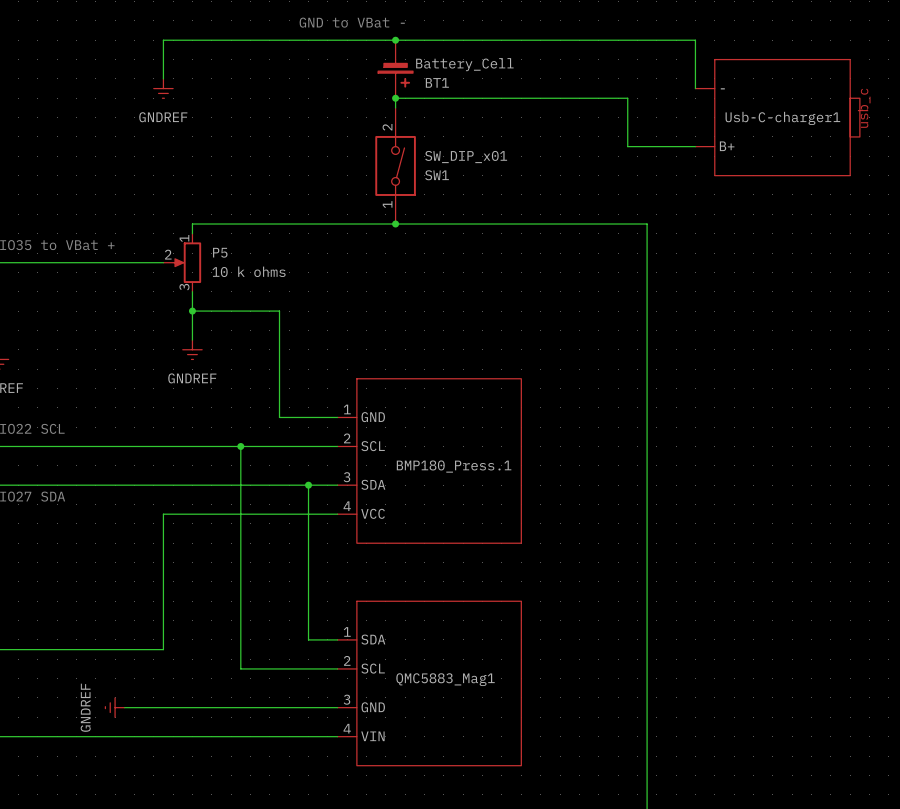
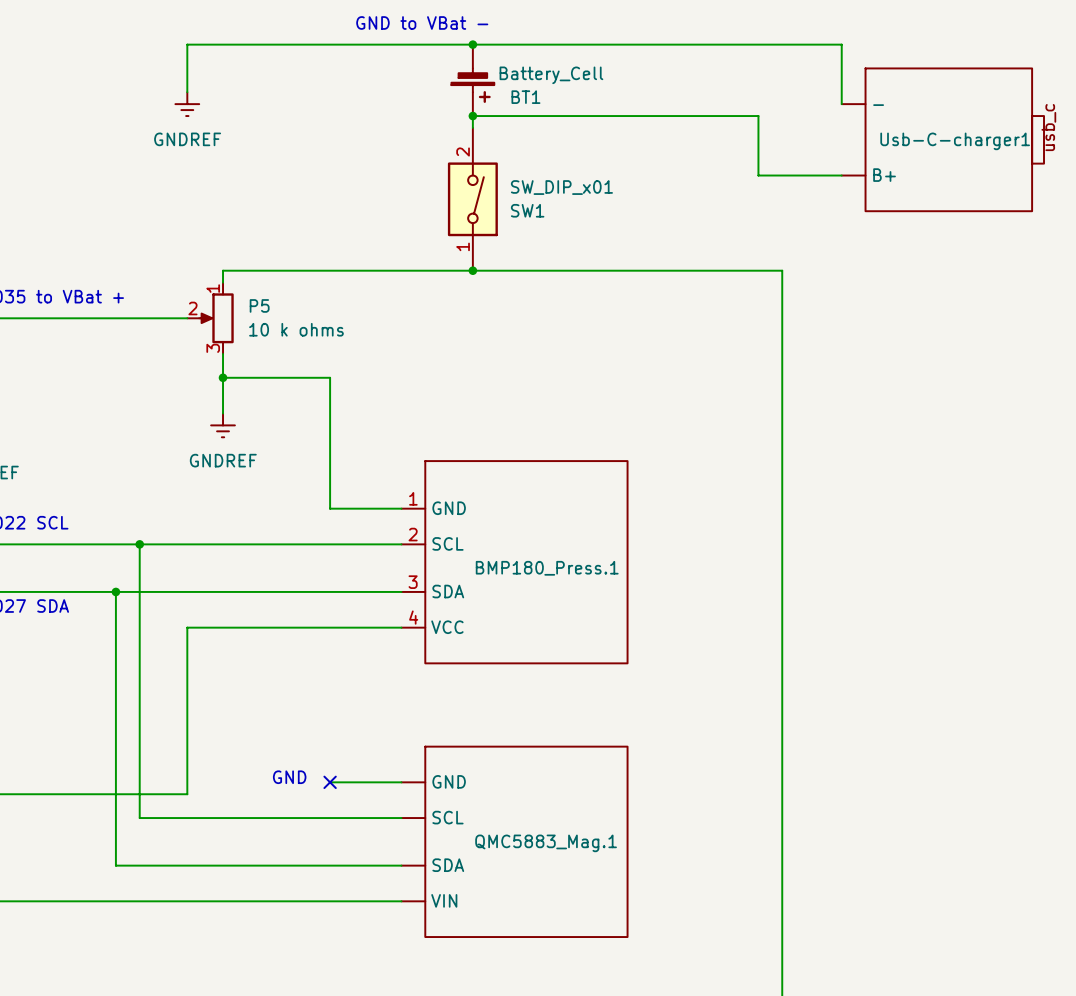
junction: none -> (139, 544)
wire: (240, 446) (240, 668) -> (139, 544) (139, 818) (282, 818)
junction: (240, 446) -> none
wire: none -> (115, 591) (115, 865) (139, 865)
junction: none -> (115, 591)
wire: (308, 485) (308, 639) -> (330, 782) (365, 782)
junction: (308, 485) -> none
text: none -> GND (289, 777)
no-connect mark: none -> (330, 782)
QMC5883_Mag1: (429, 683) -> none
QMC5883_Mag.1: none -> (514, 841)
power symbol: GNDREF (115, 707) -> none

